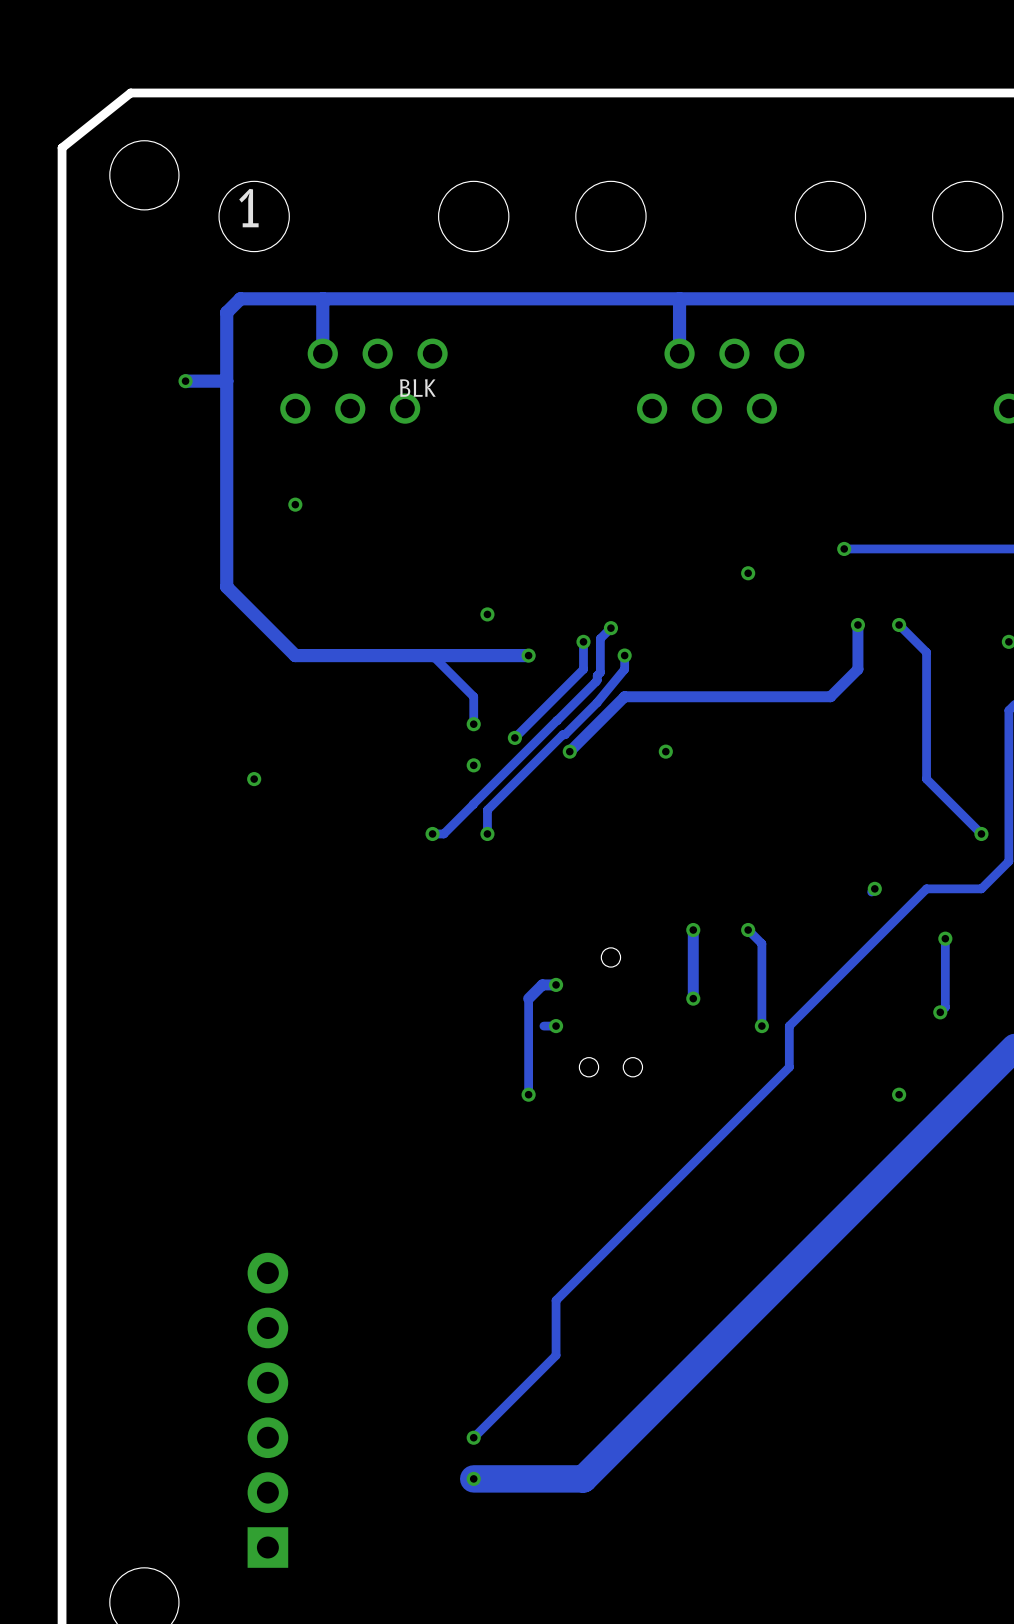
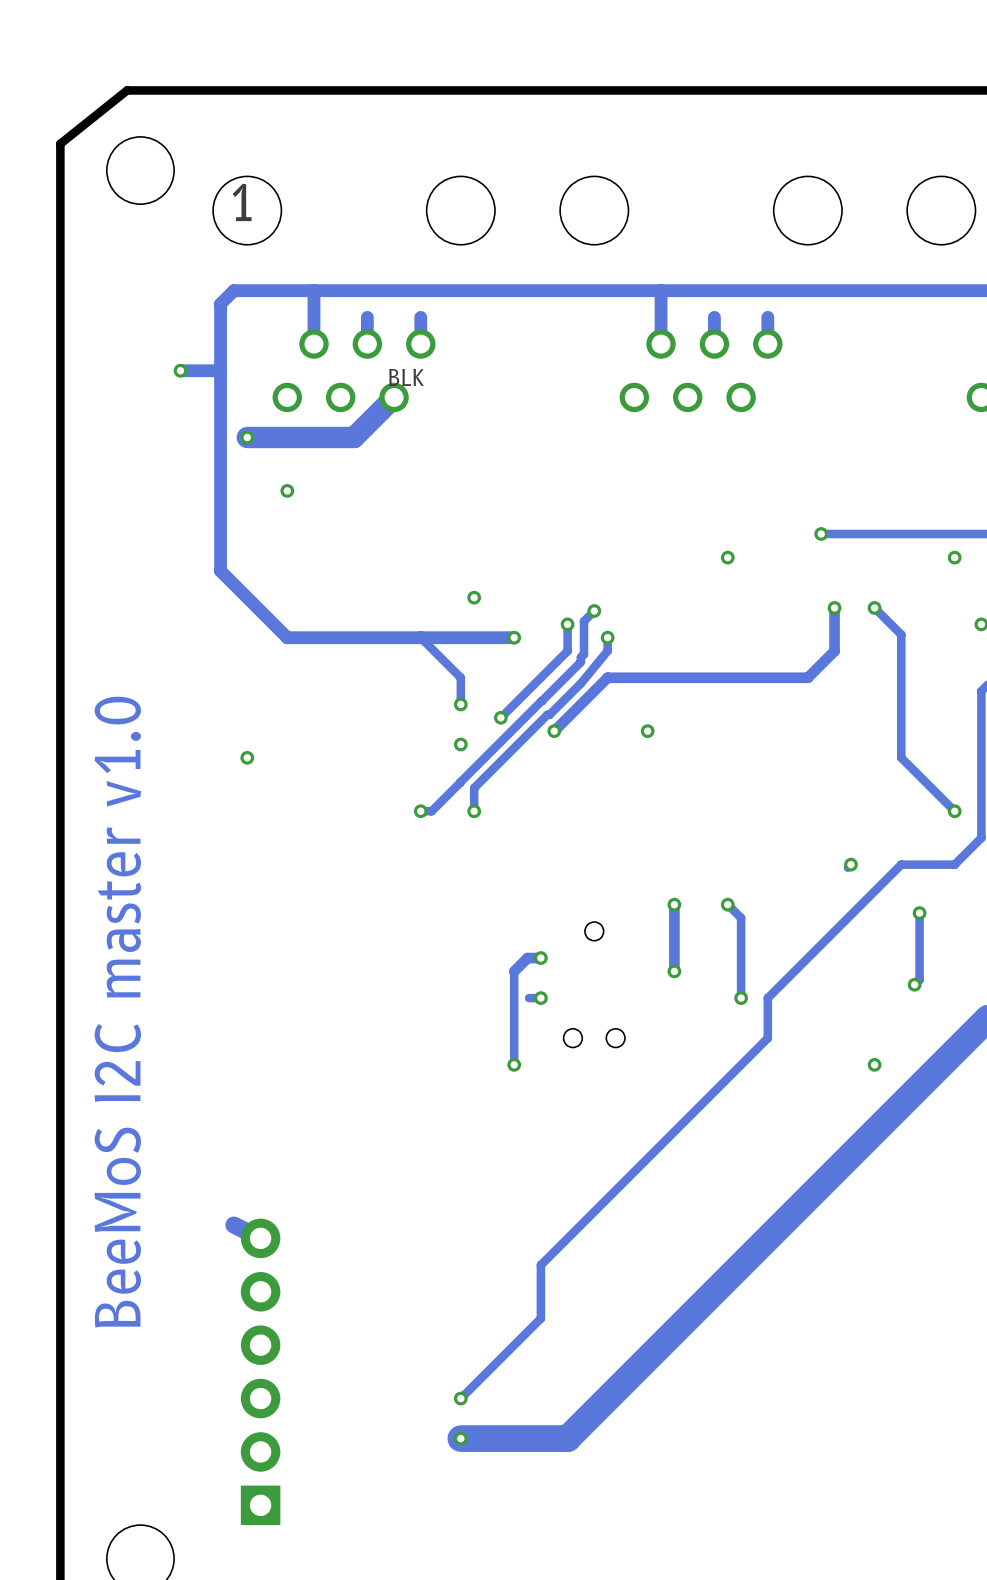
track: none -> (367, 317) (367, 344)
track: none -> (420, 317) (420, 344)
track: none -> (714, 317) (714, 344)
track: none -> (767, 317) (767, 344)
track: none -> (394, 397) (354, 437) (247, 437)
via: none -> (247, 437)
via: none -> (954, 557)
text: none -> BeeMoS I2C master v1.0 (117, 1012)
track: none -> (233, 1225) (260, 1238)

